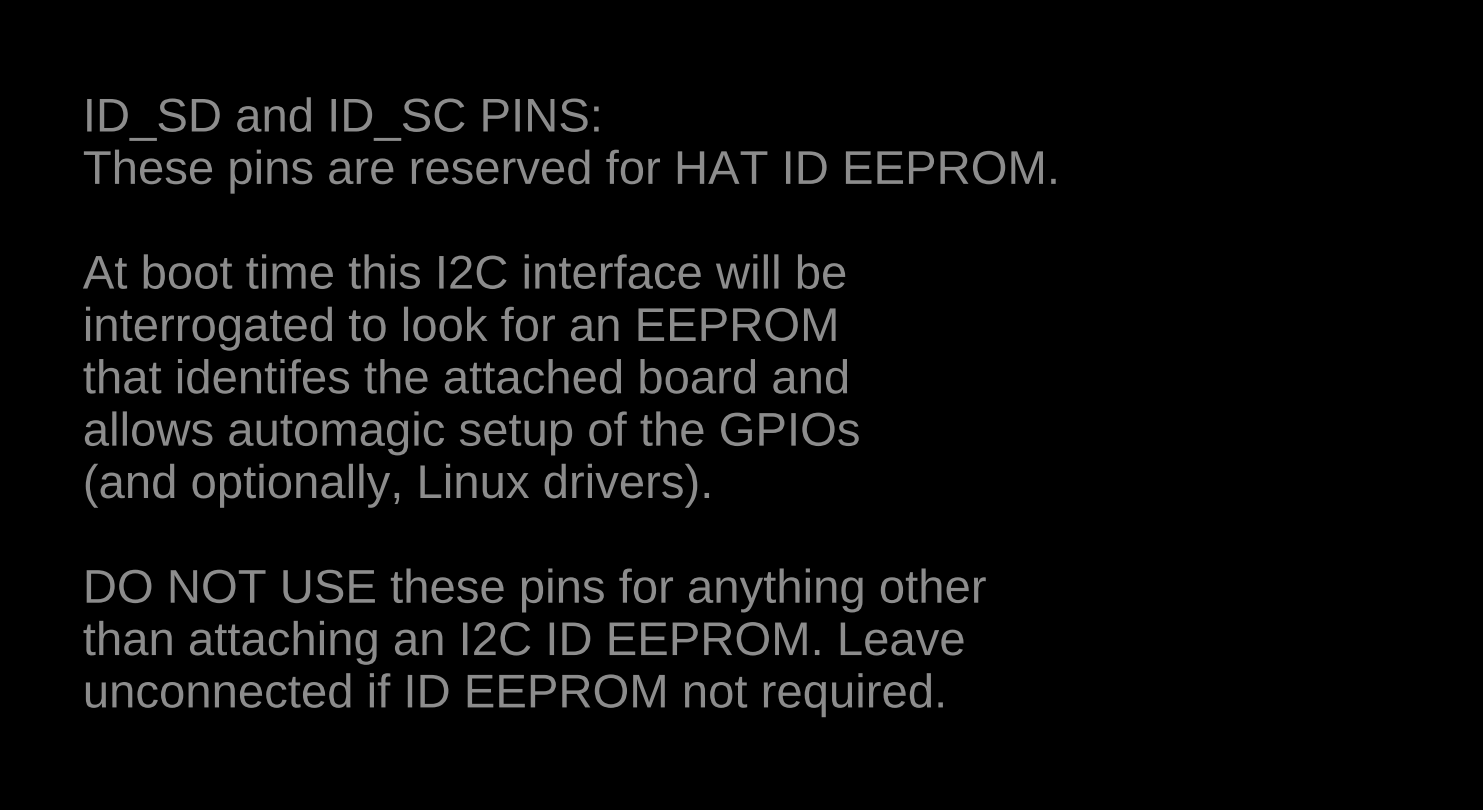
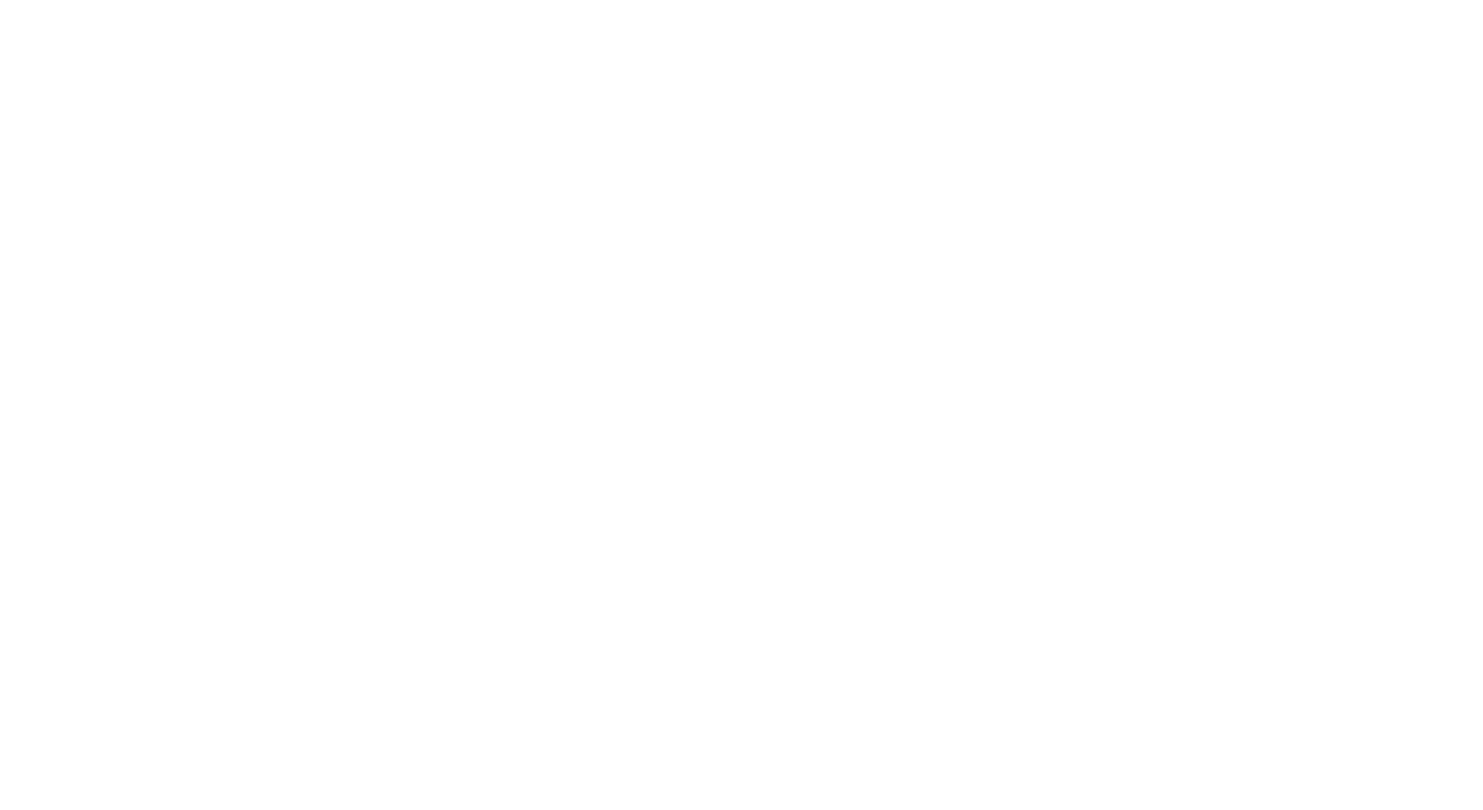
text: ID_SD and ID_SC PINS: (342, 119) -> none
text: These pins are reserved for HAT ID EEPROM. (569, 171) -> none
text: At boot time this I2C interface will be (464, 271) -> none
text: interrogated to look for an EEPROM (460, 328) -> none
text: that identifes the attached board and (465, 376) -> none
text: allows automagic setup of the GPIOs (471, 433) -> none
text: (and optionally, Linux drivers). (397, 485) -> none
text: DO NOT USE these pins for anything other (536, 590) -> none
text: than attaching an I2C ID EEPROM. Leave (523, 642) -> none
text: unconnected if ID EEPROM not required. (514, 695) -> none

